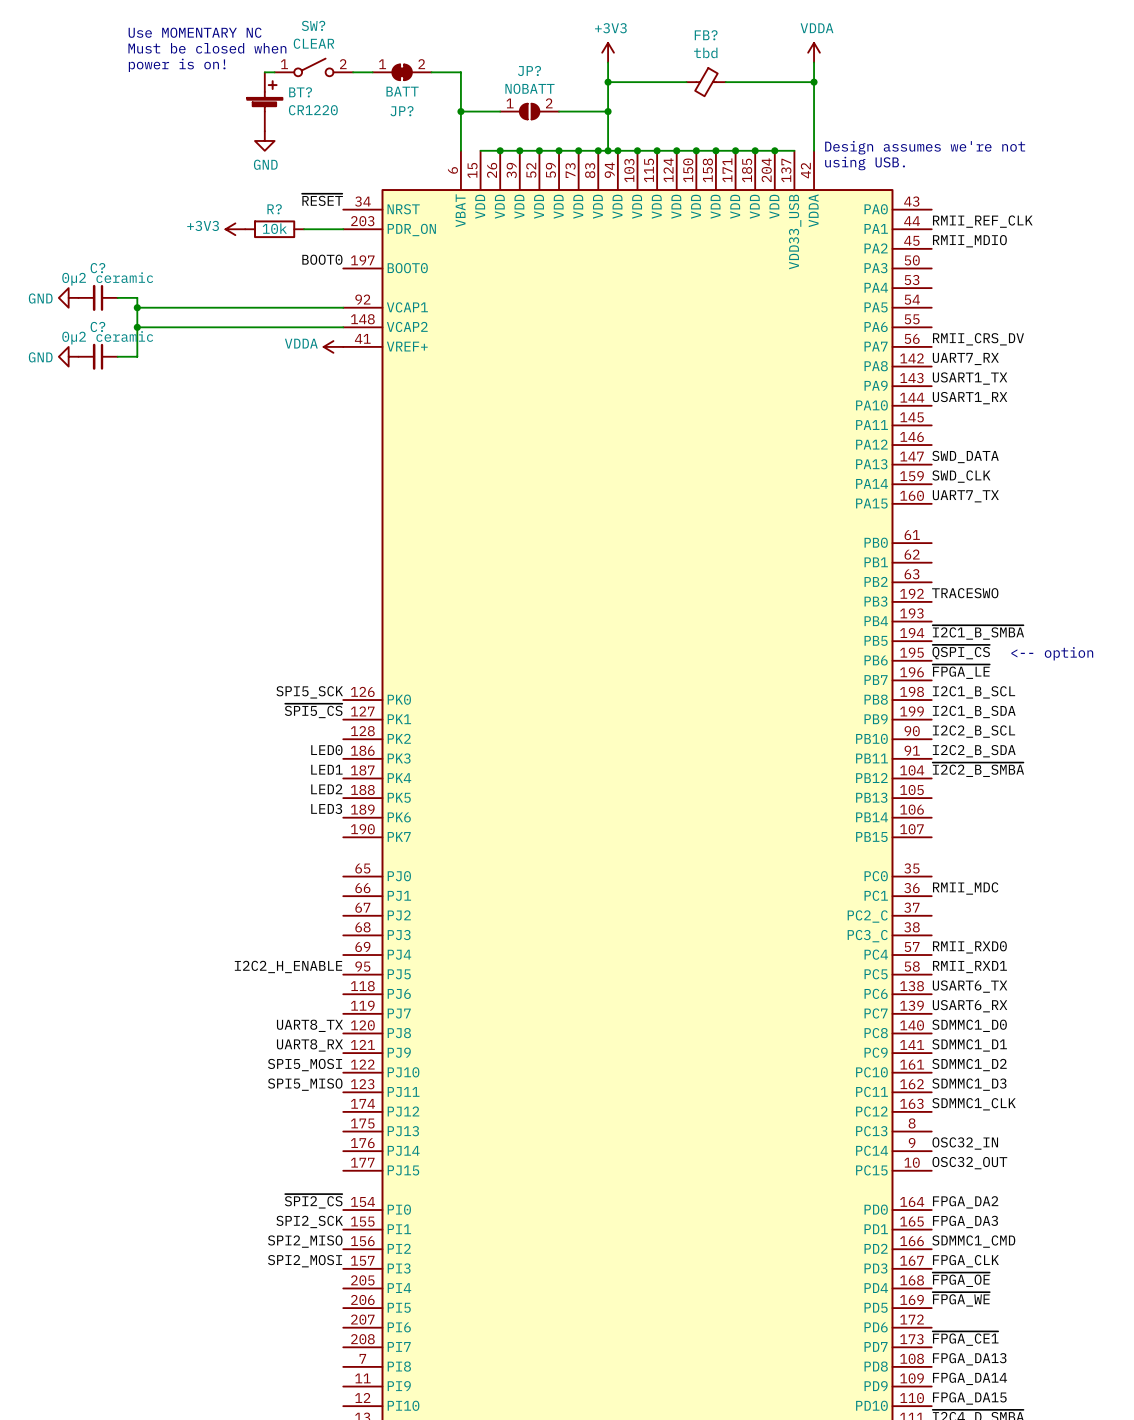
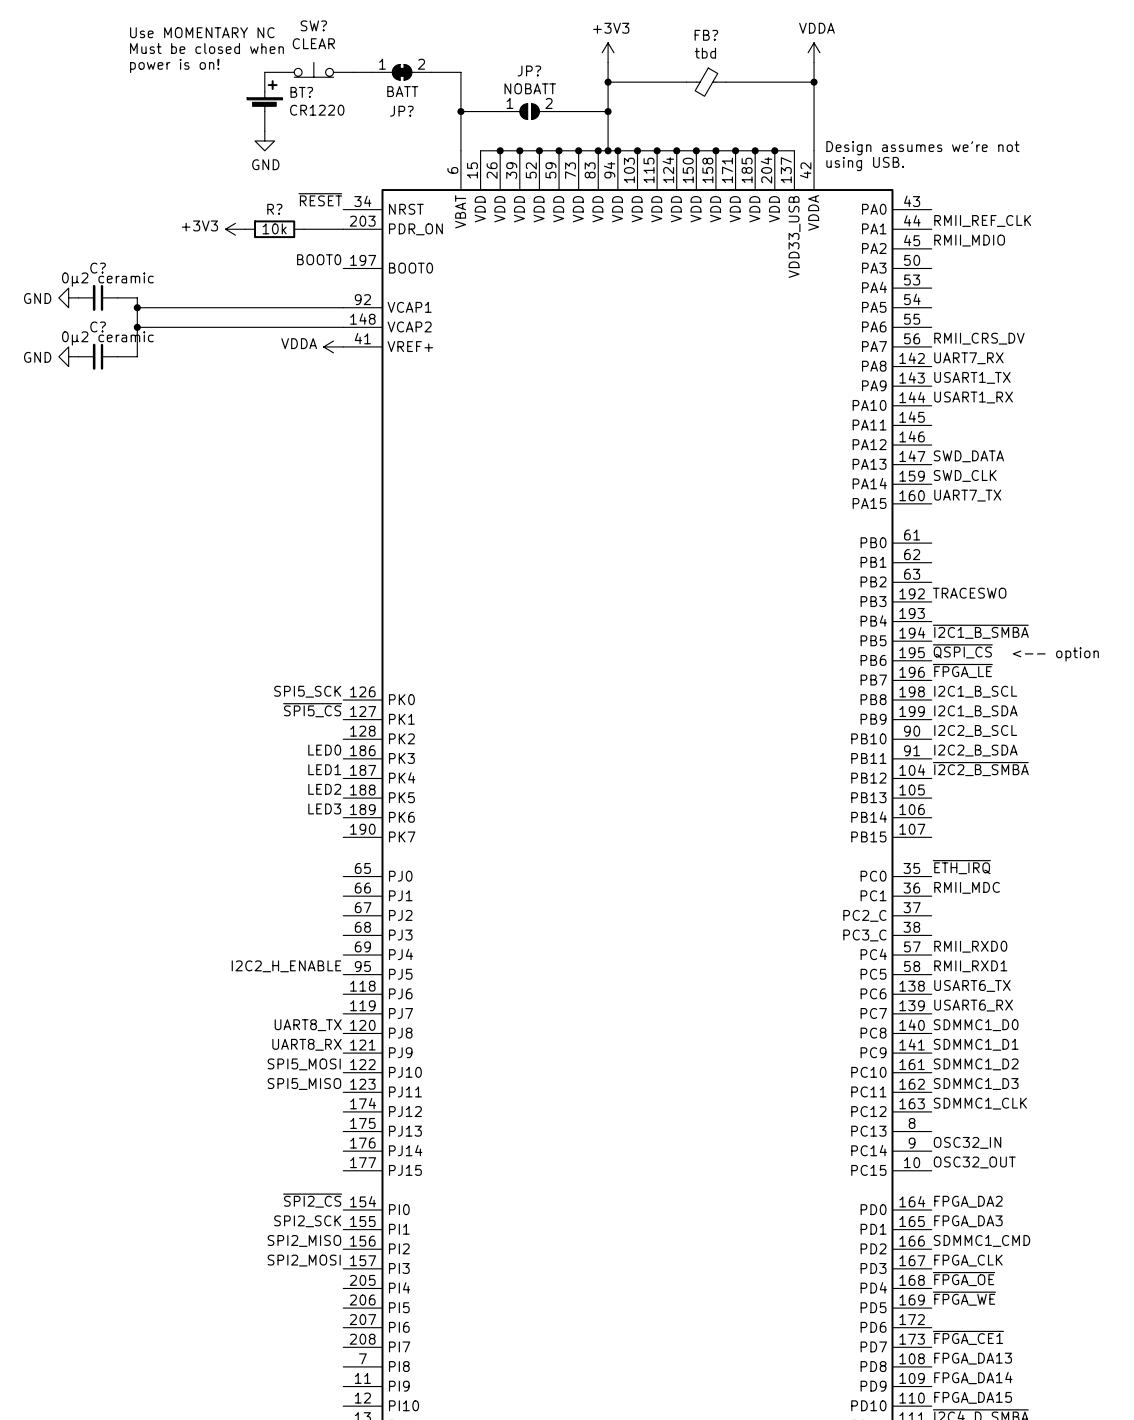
SW? symbol: [274, 58, 354, 77] -> [274, 62, 354, 78]
label: none -> ~{ETH_IRQ} (961, 867)

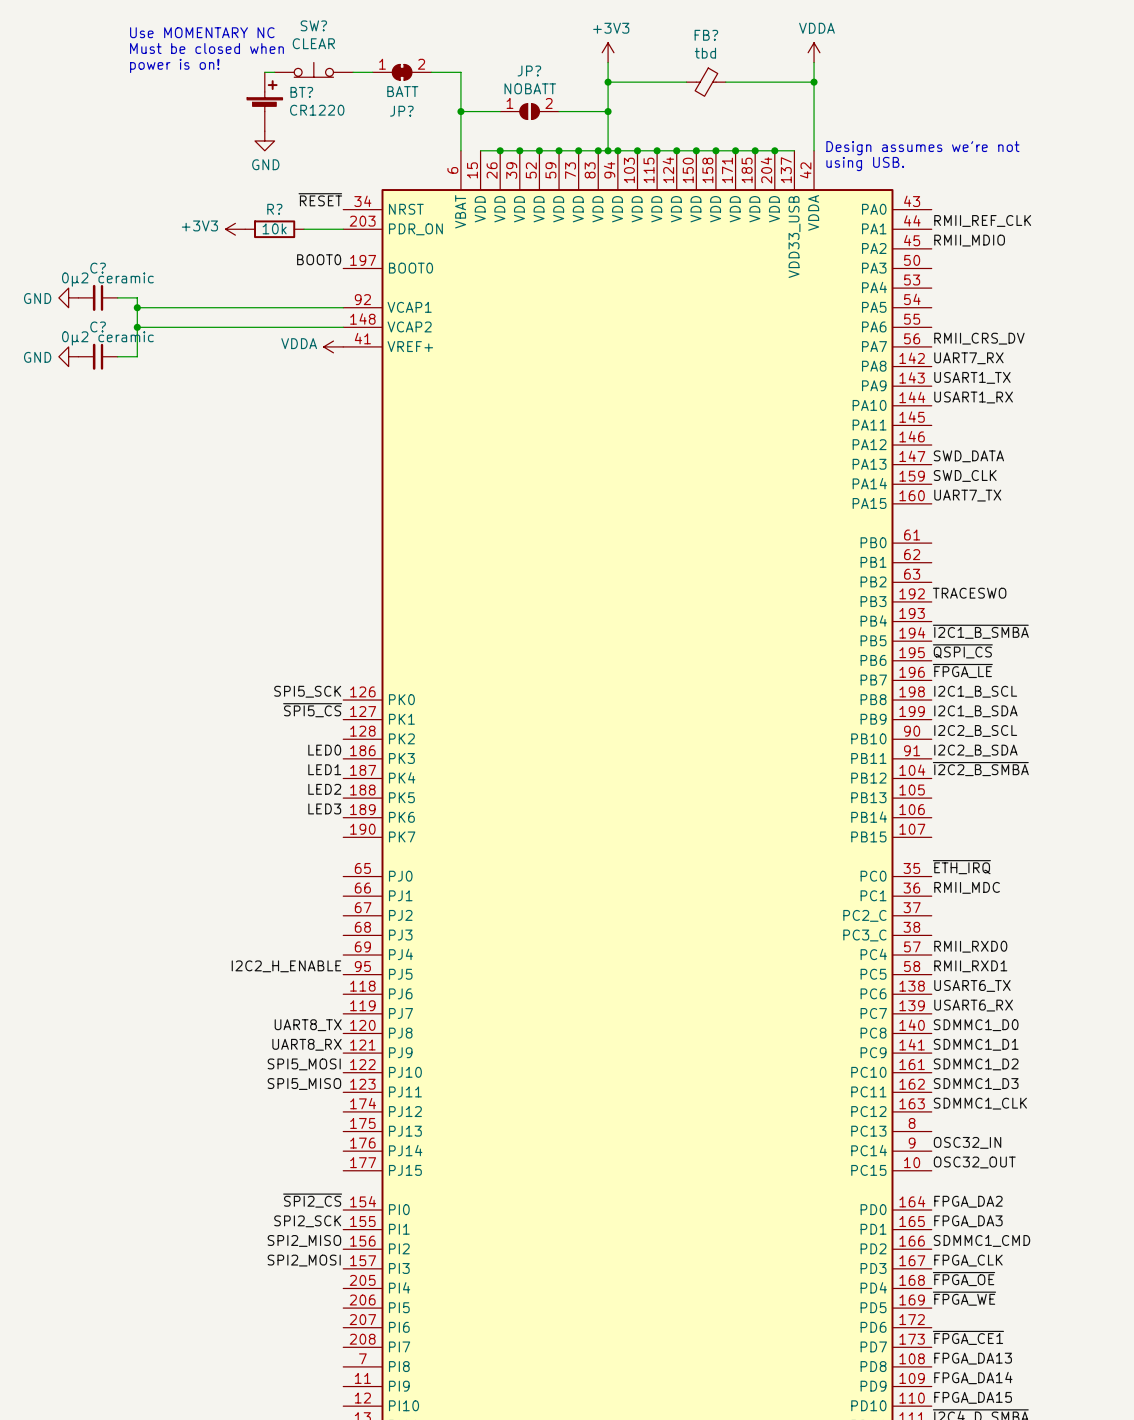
text: <-- option (1055, 654) -> none

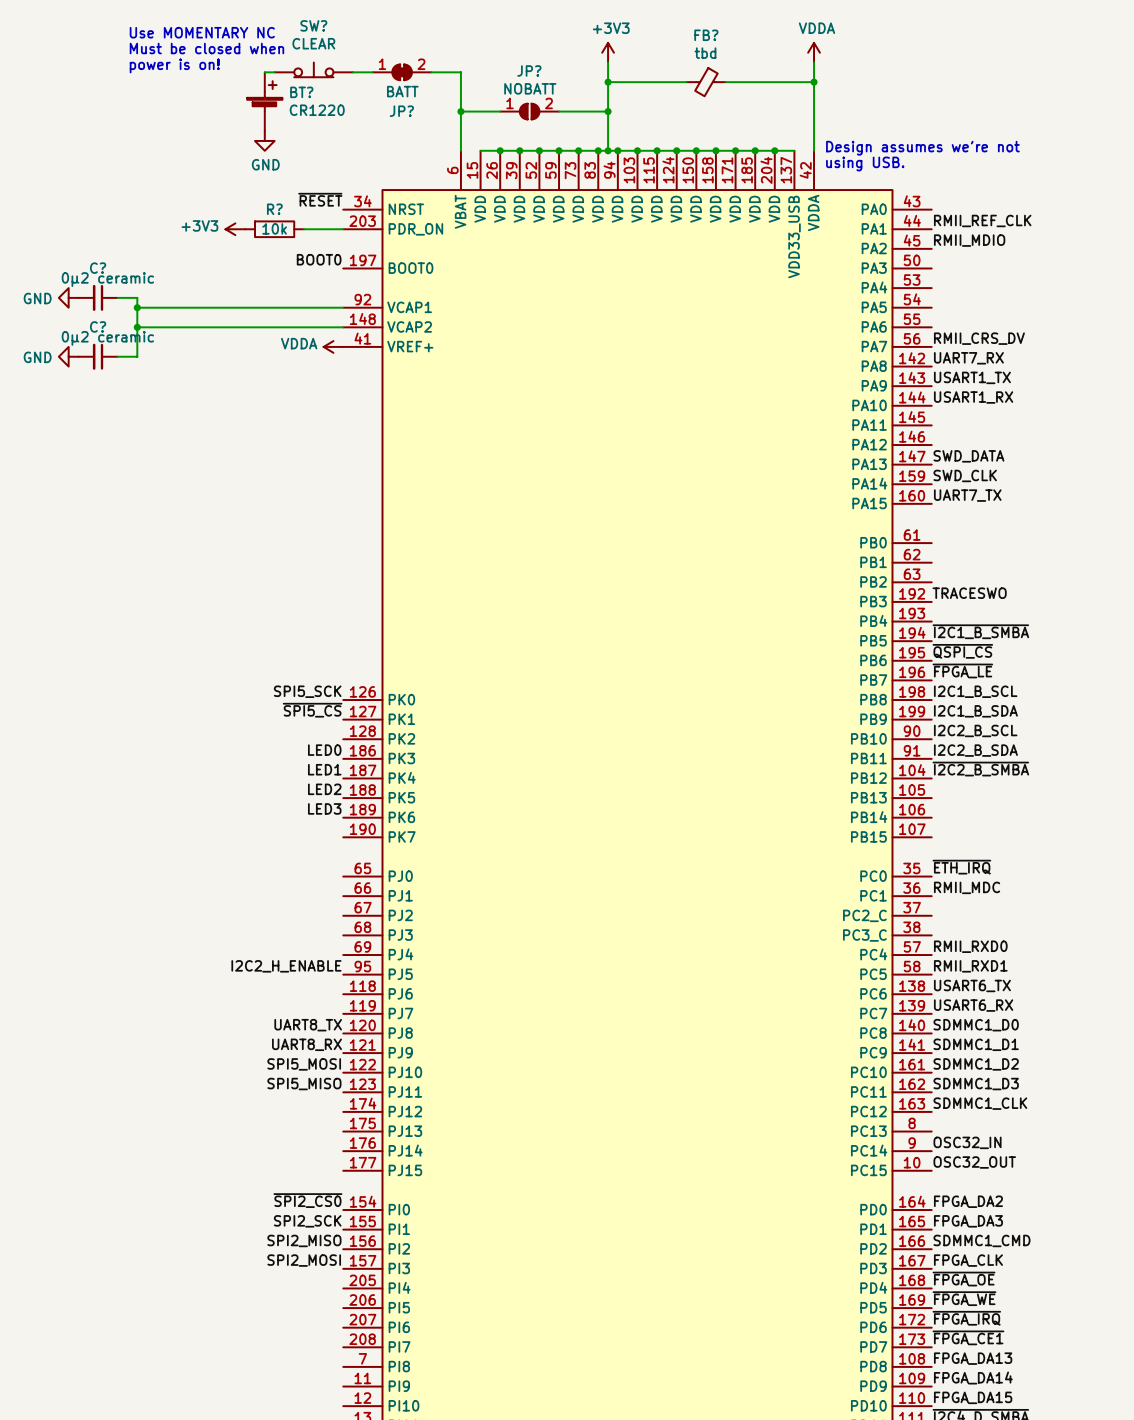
label: ~{SPI2_CS} (312, 1200) -> ~{SPI2_CS0} (307, 1200)
label: none -> ~{FPGA_IRQ} (966, 1318)

